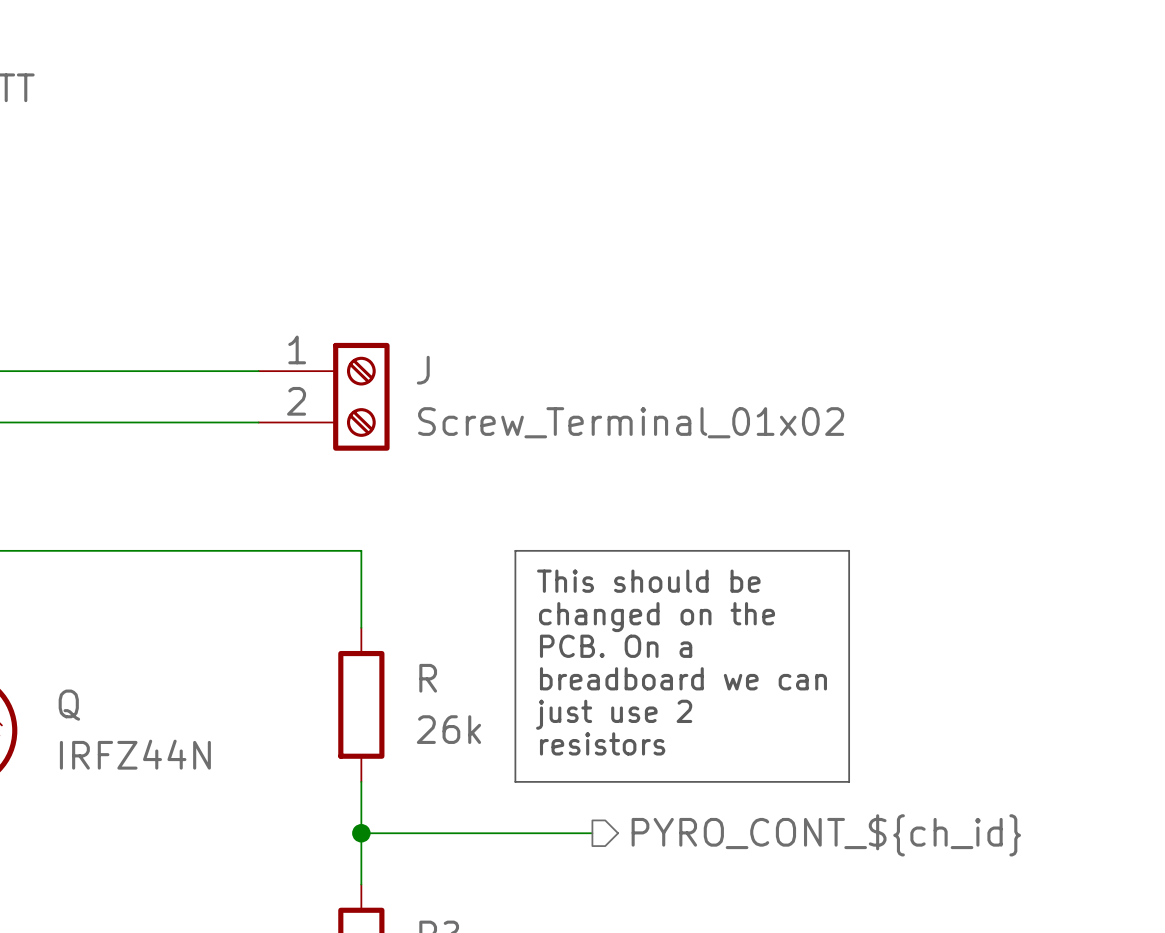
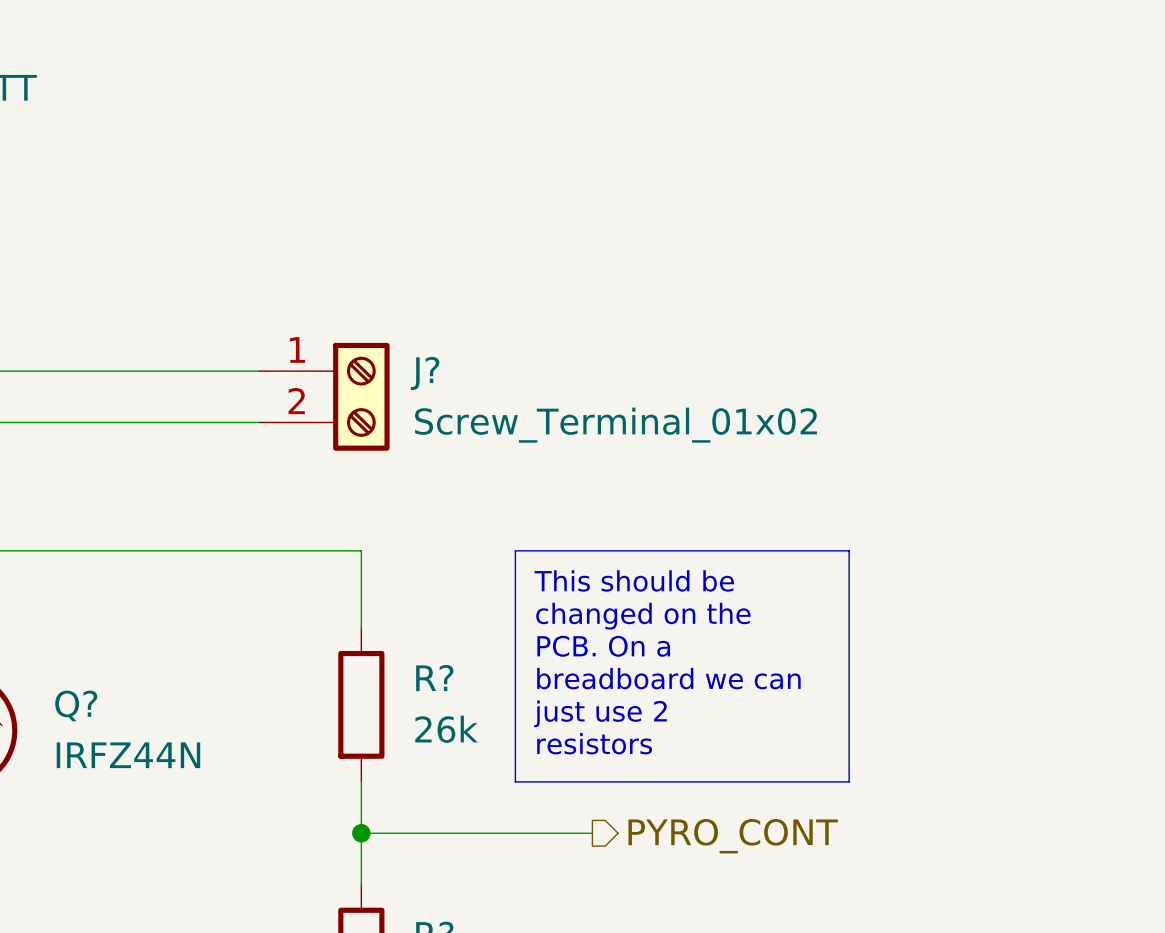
J name: J (423, 370) -> J? (425, 373)
R name: R (428, 678) -> R? (434, 678)
Q name: Q (69, 705) -> Q? (76, 705)
hierarchical label: PYRO_CONT_${ch_id} (826, 835) -> PYRO_CONT (733, 836)

